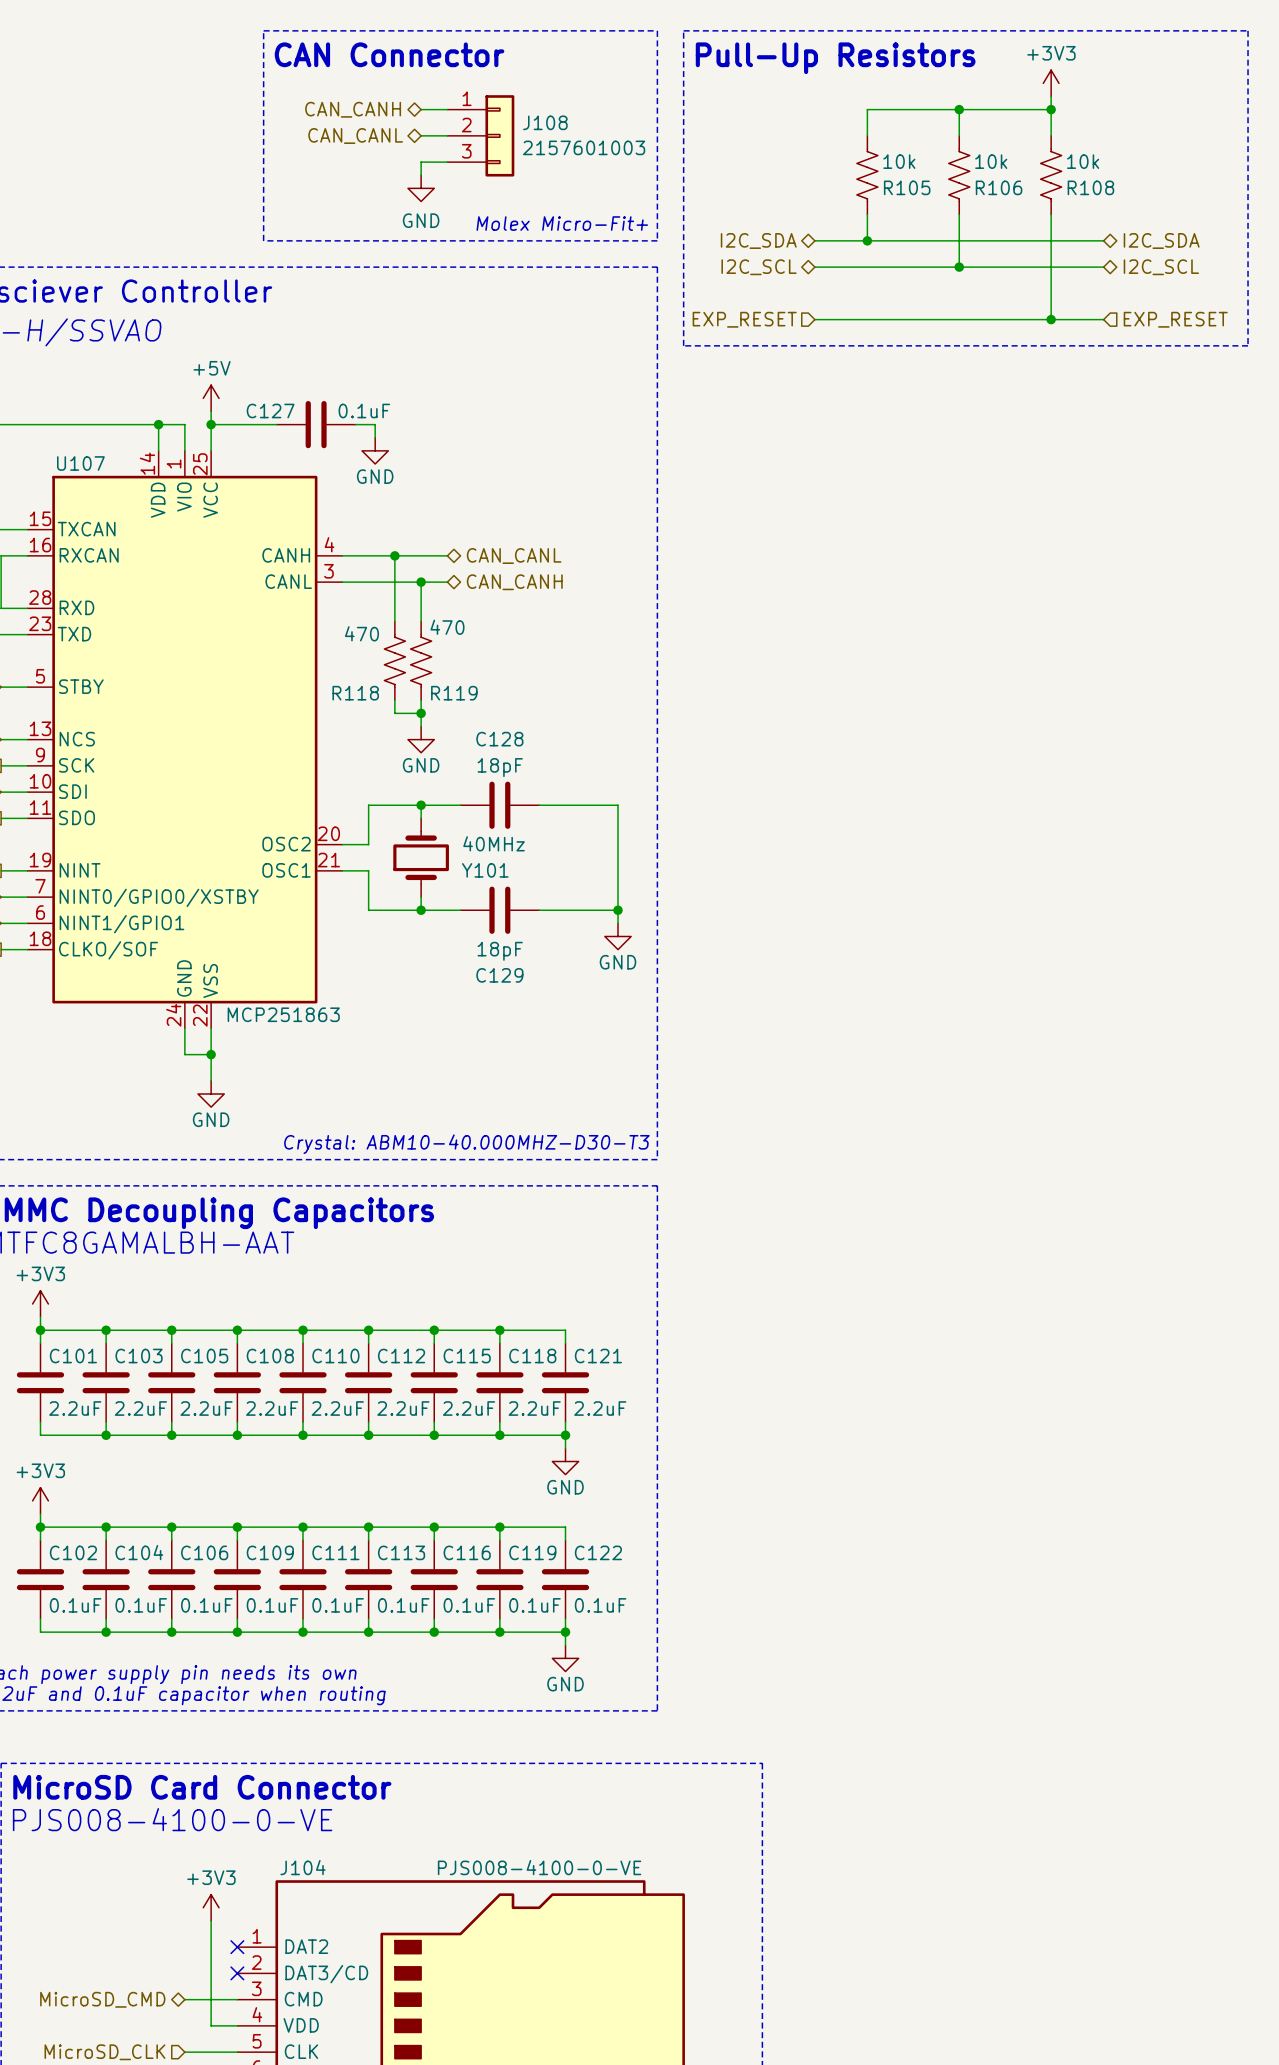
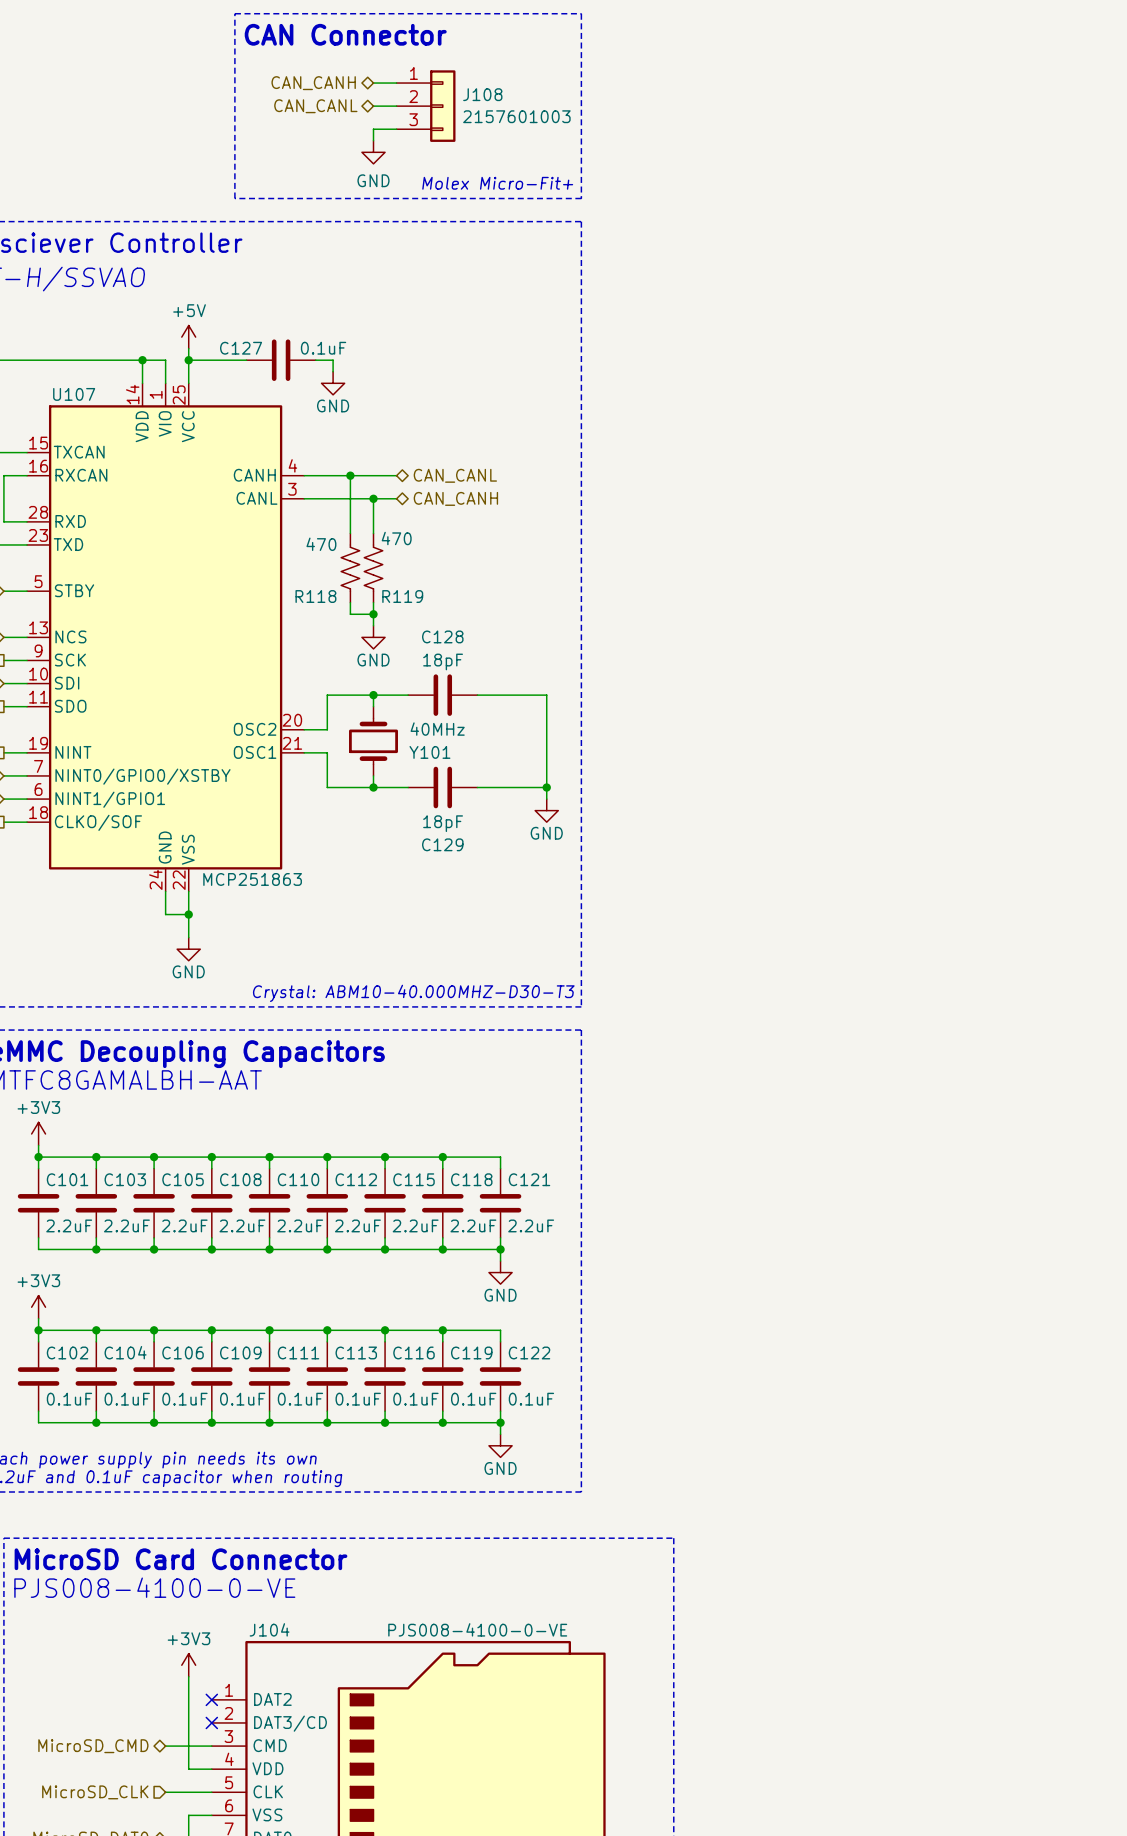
line: (683, 30) (1248, 30) (1248, 345) (683, 345) (683, 30) -> none
text: Pull-Up Resistors (835, 58) -> none
power symbol: +3V3 (1051, 83) -> none
wire: (1051, 96) (1051, 135) -> none
wire: (959, 109) (959, 135) -> none
junction: (959, 109) -> none
wire: (1051, 109) (867, 109) (867, 135) -> none
junction: (1051, 109) -> none
R105: 10k (867, 175) -> none
R106: 10k (959, 175) -> none
R108: 10k (1051, 175) -> none
wire: (867, 214) (867, 240) -> none
wire: (959, 214) (959, 267) -> none
wire: (1051, 214) (1051, 319) -> none
wire: (814, 240) (1103, 240) -> none
junction: (867, 240) -> none
hierarchical label: I2C_SDA (758, 241) -> none
hierarchical label: I2C_SDA (1161, 241) -> none
hierarchical label: I2C_SCL (759, 267) -> none
wire: (814, 267) (1103, 267) -> none
junction: (959, 267) -> none
hierarchical label: I2C_SCL (1161, 267) -> none
hierarchical label: EXP_RESET (744, 319) -> none
wire: (814, 319) (1103, 319) -> none
junction: (1051, 319) -> none
hierarchical label: EXP_RESET (1175, 319) -> none

